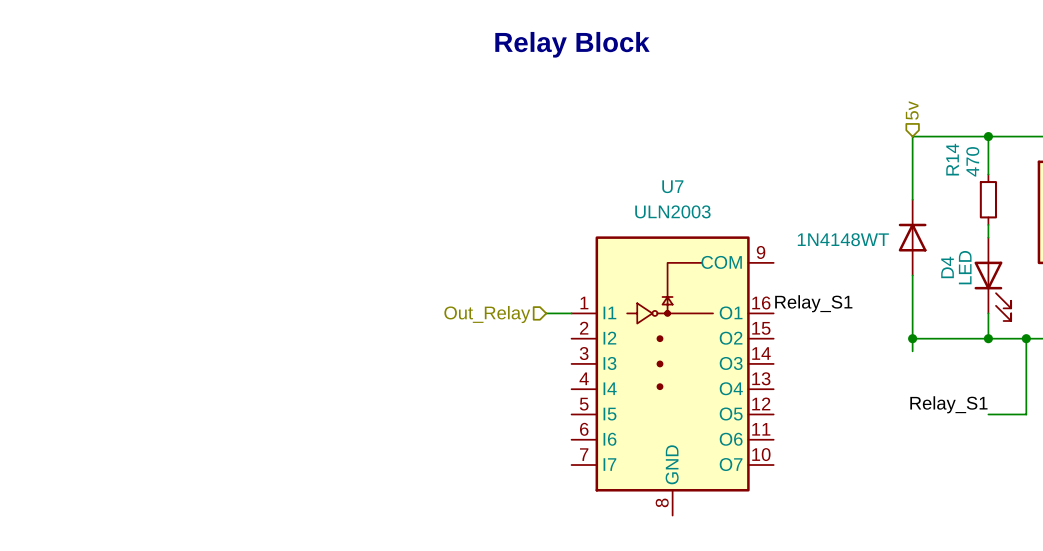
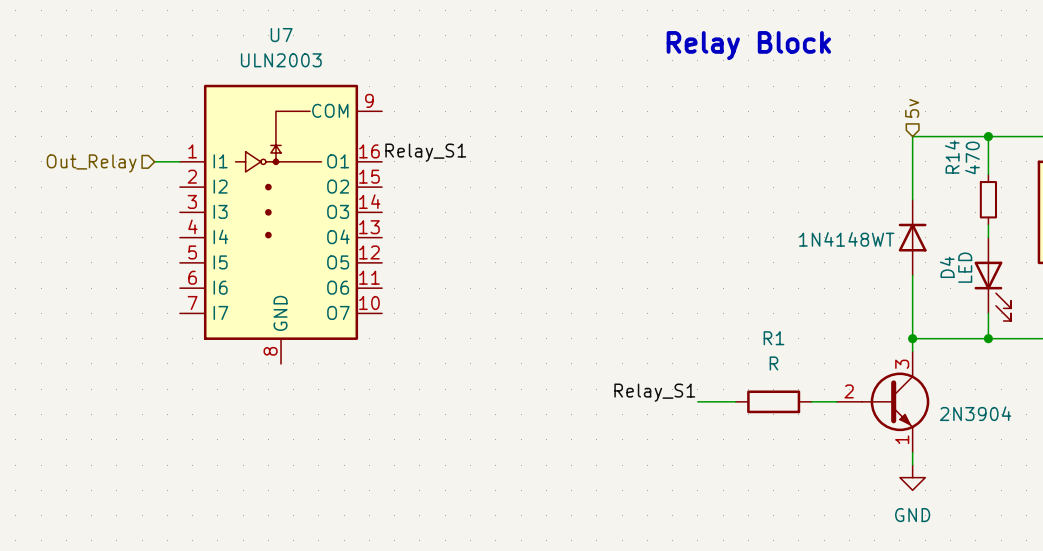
text position: Relay Block (572, 44) -> Relay Block (748, 45)
label: none -> Relay_S1 (425, 152)
wire: none -> (154, 161) (179, 161)
hierarchical label: none -> Out_Relay (91, 163)
label position: Relay_S1 (813, 303) -> Relay_S1 (654, 392)
wire: (546, 313) (571, 313) -> none
hierarchical label: Out_Relay (487, 314) -> none
wire: (1026, 338) (1026, 414) (988, 414) -> none
junction: (1026, 338) -> none
U7 position: (672, 375) -> (281, 224)
R1: none -> R (773, 401)
wire: none -> (811, 401) (836, 401)
part: none -> 2N3904 (883, 401)
label: Relay_S1 (948, 404) -> none
wire: none -> (912, 452) (912, 465)
power symbol: none -> GND (912, 477)

